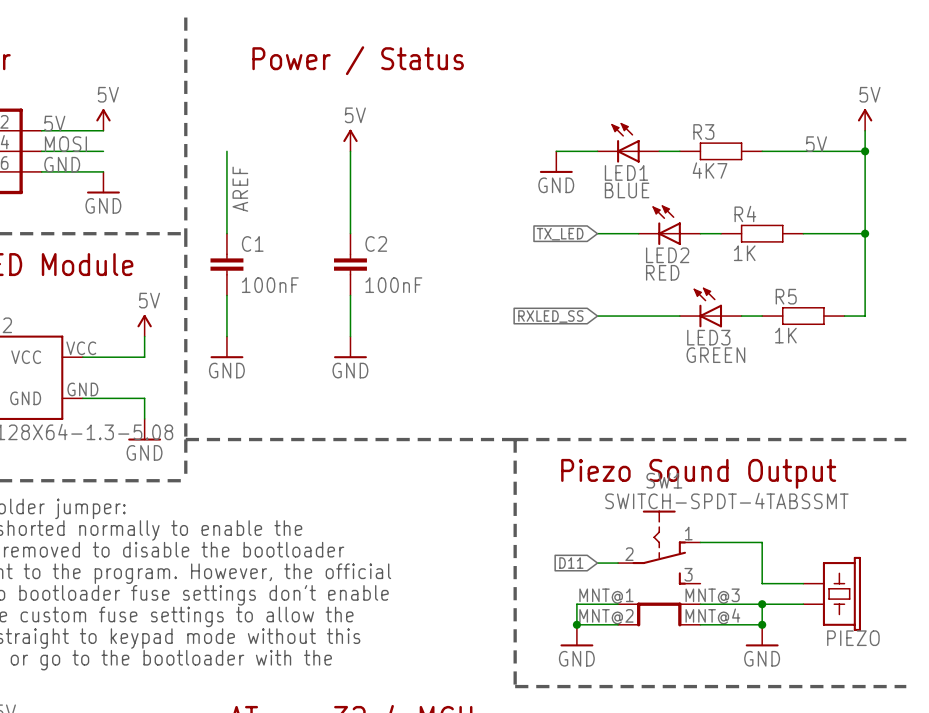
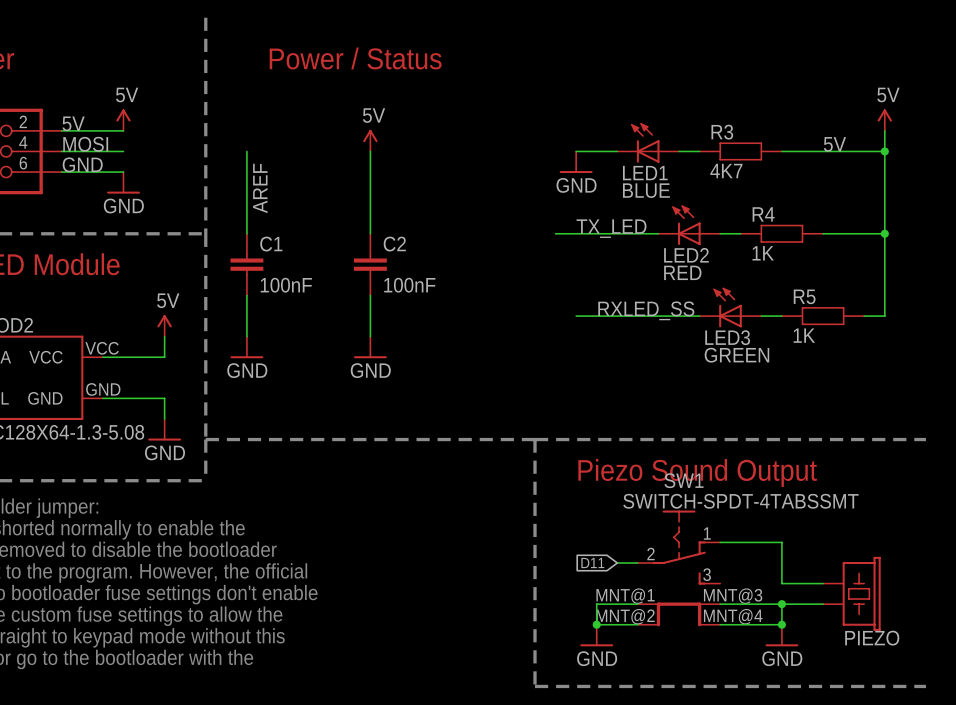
label: none -> TX_LED (611, 228)
wire: none -> (555, 233) (617, 233)
global label: TX_LED (560, 234) -> none
label: none -> RXLED_SS (646, 310)
global label: RXLED_SS (550, 316) -> none
wire: none -> (576, 316) (617, 316)

